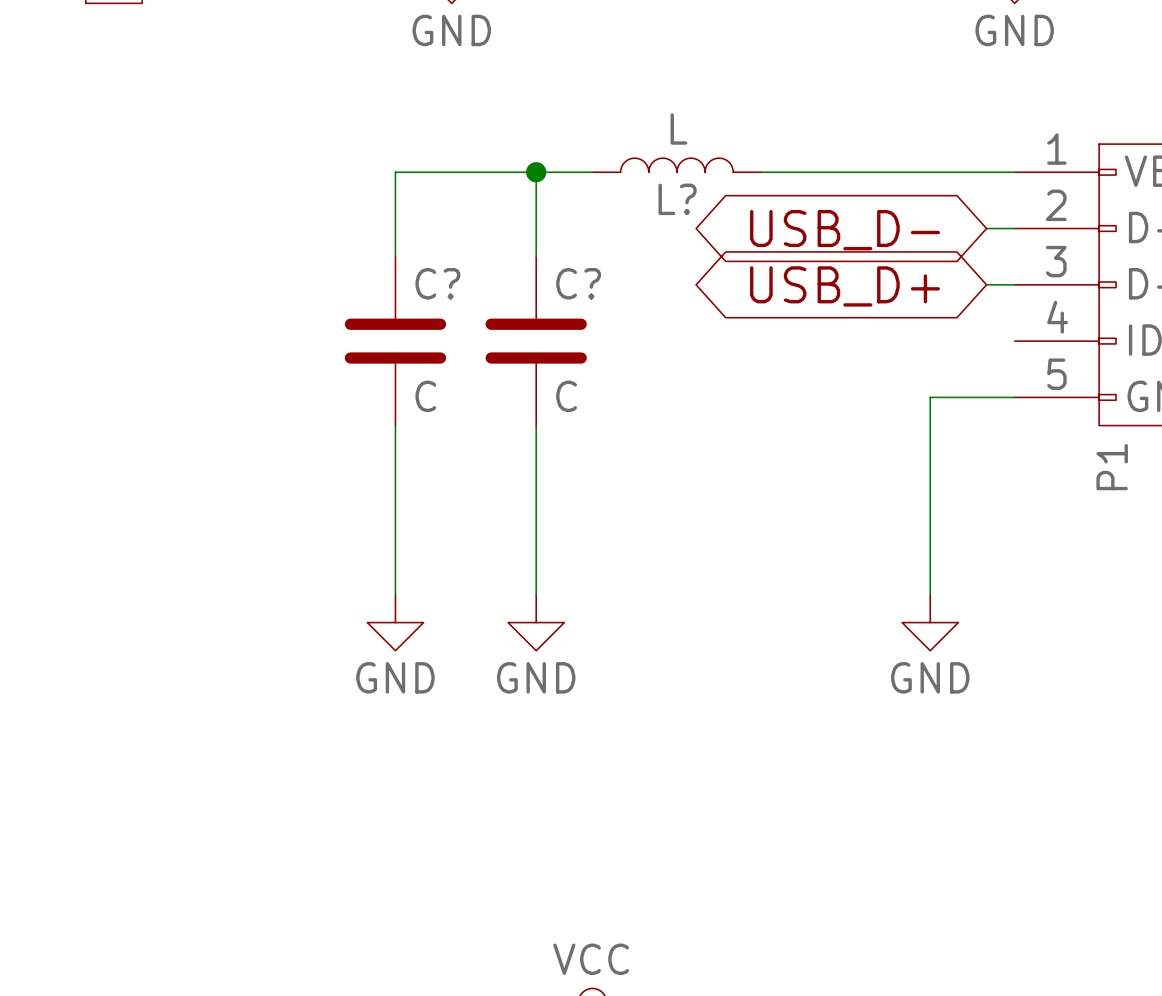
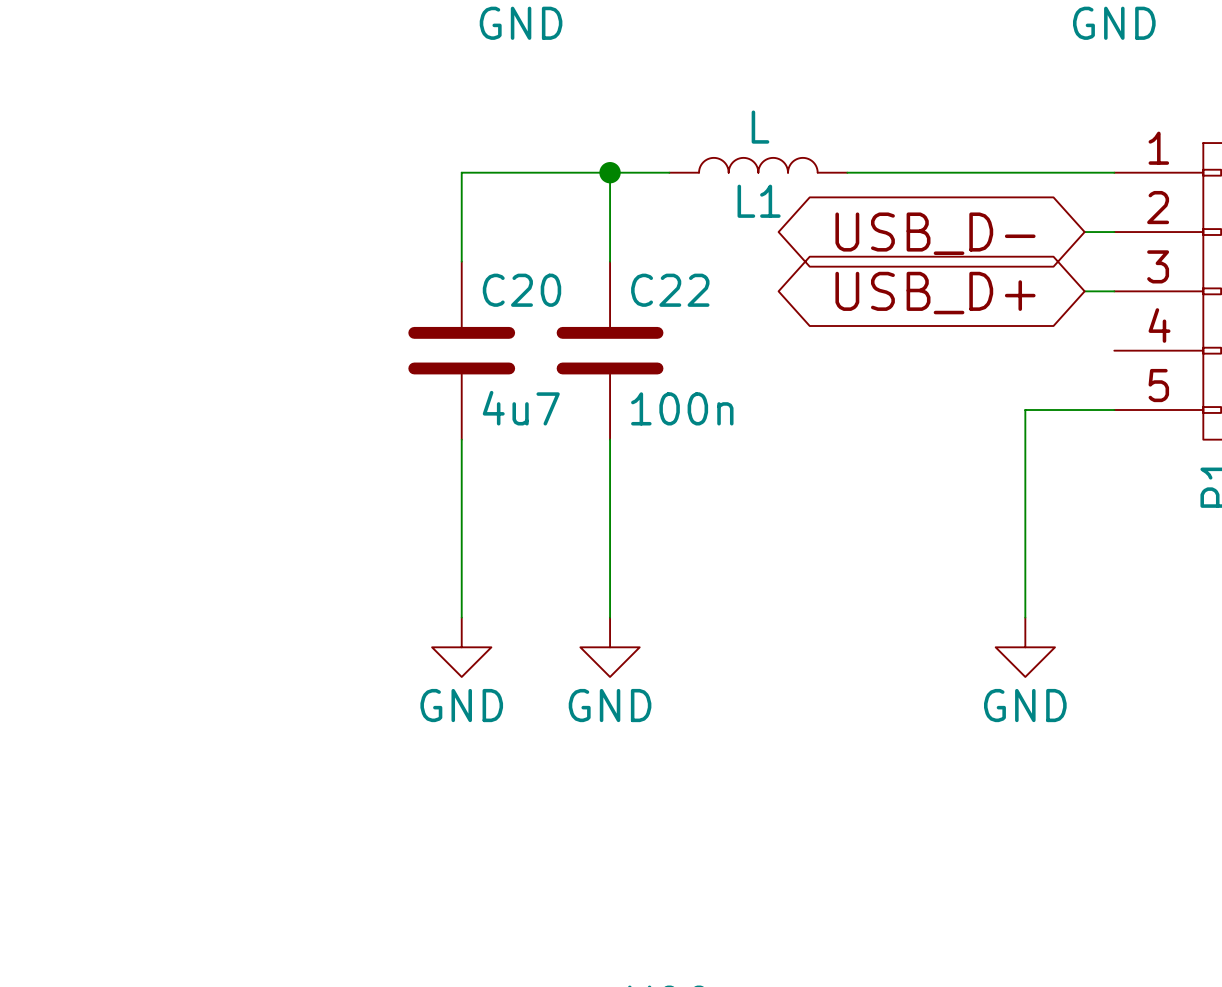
L? name: L? (677, 199) -> L1 (759, 201)
C? name: C? (437, 283) -> C20 (521, 290)
C? name: C? (578, 283) -> C22 (670, 290)
C? value: C (425, 396) -> 4u7 (521, 408)
C? value: C (566, 396) -> 100n (682, 408)

